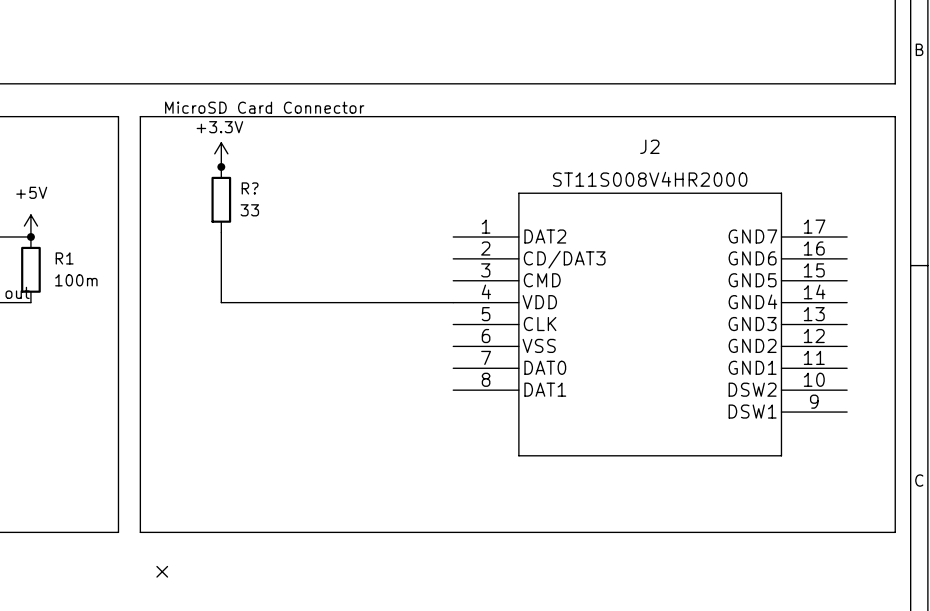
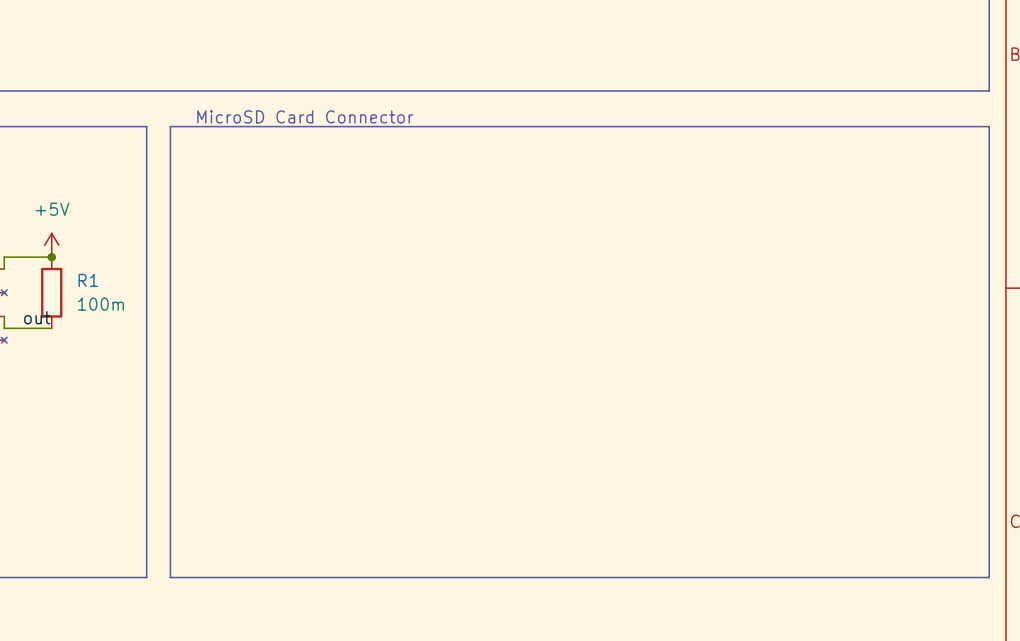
power symbol: +3.3V (221, 153) -> none
junction: (221, 166) -> none
R?: 33 (221, 199) -> none
wire: (221, 232) (221, 302) (453, 302) -> none
J2: ST11S008V4HR2000 (650, 324) -> none
no-connect mark: (162, 571) -> none

